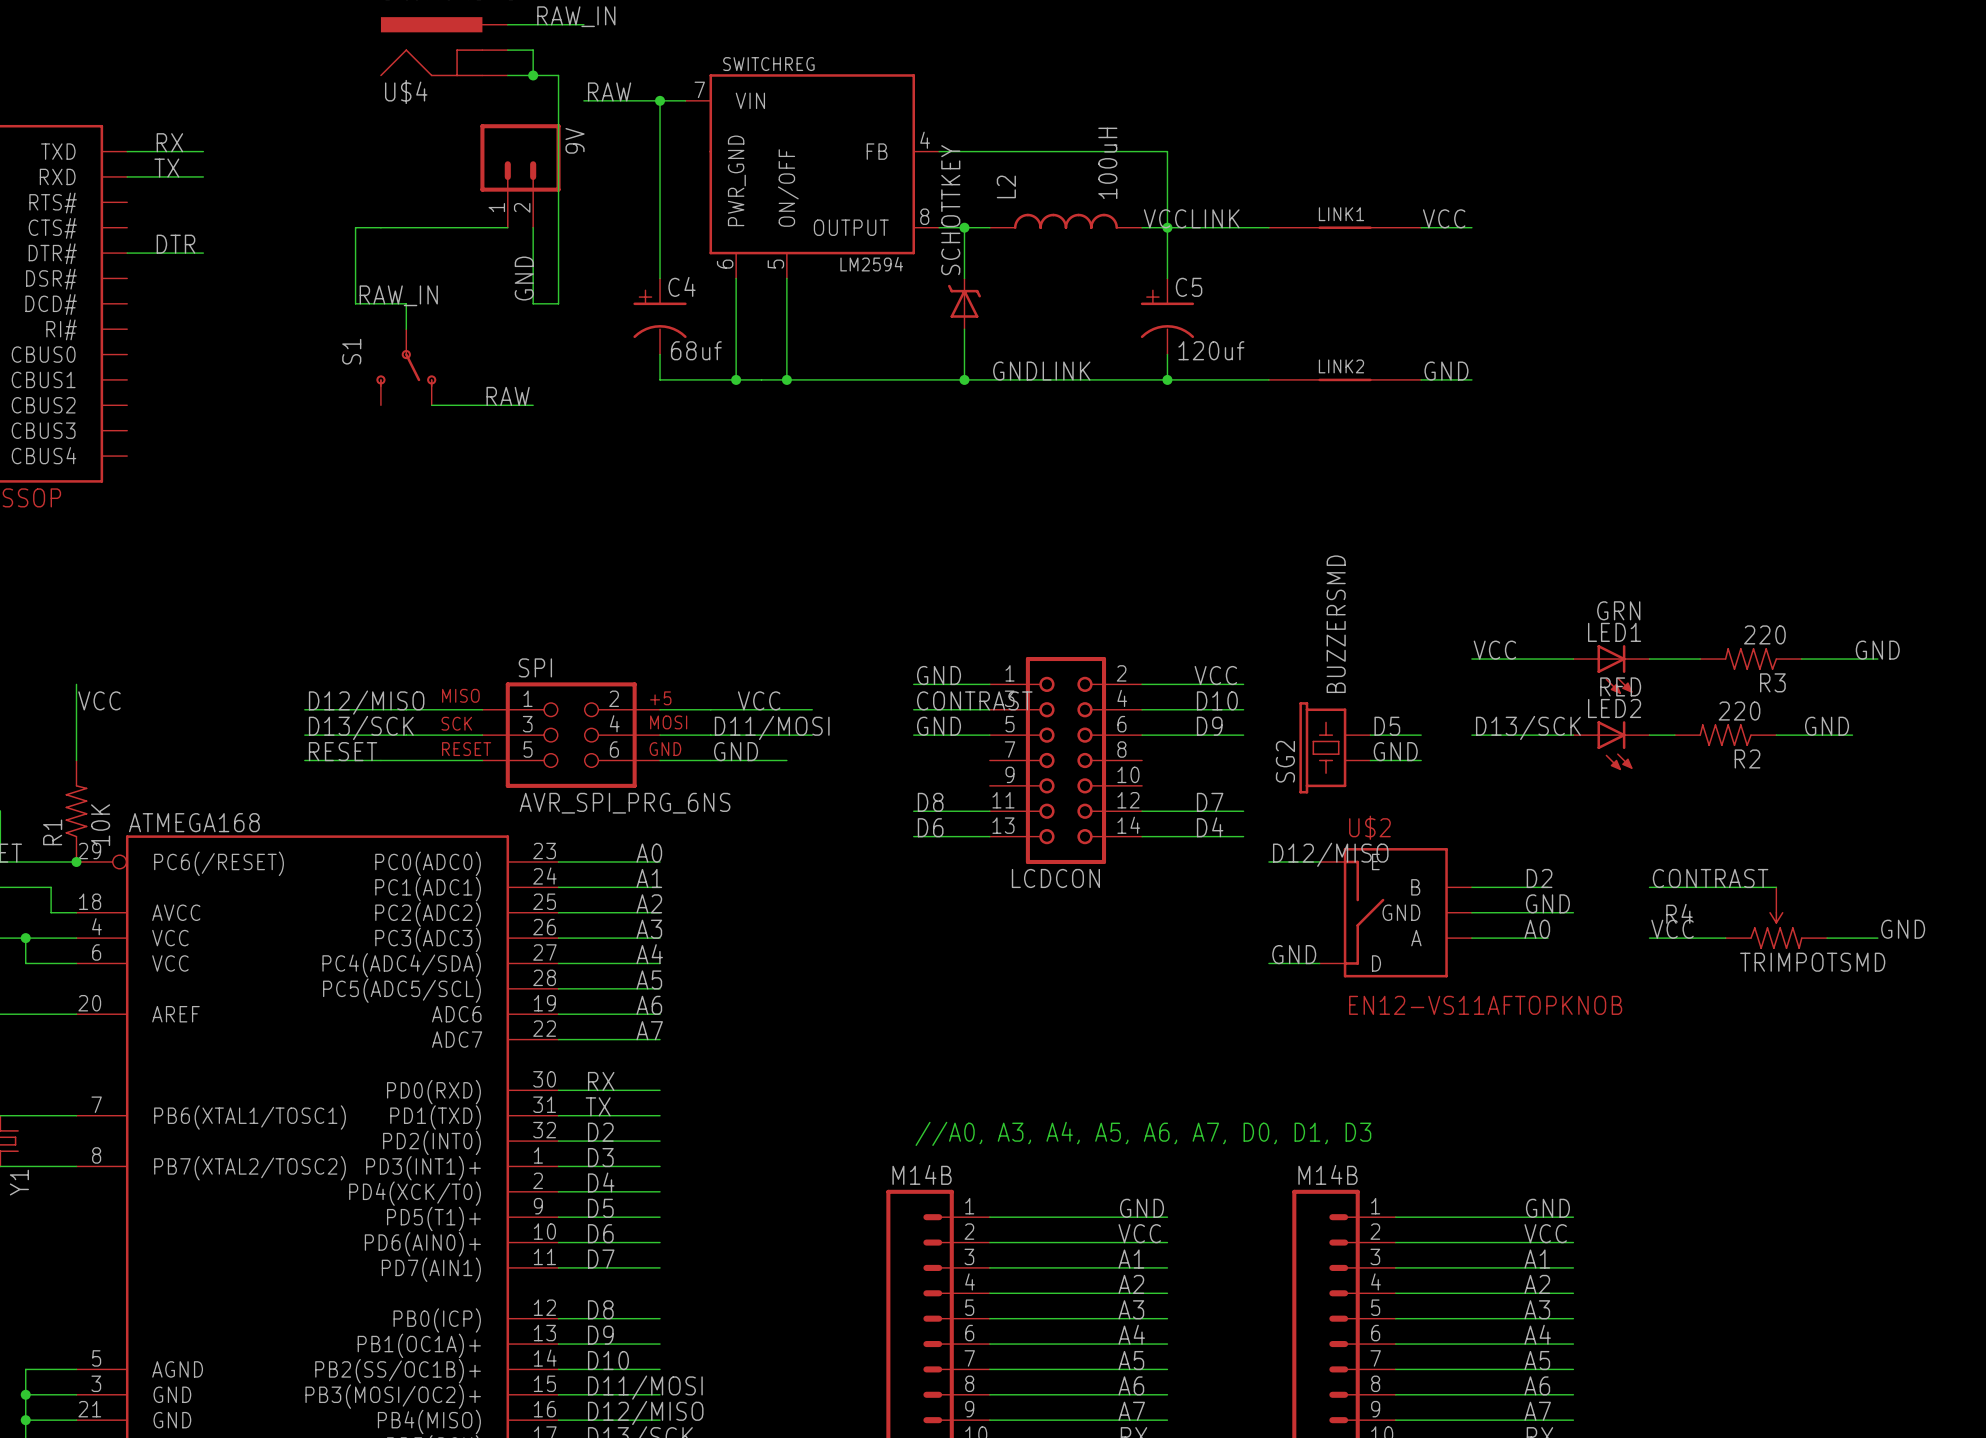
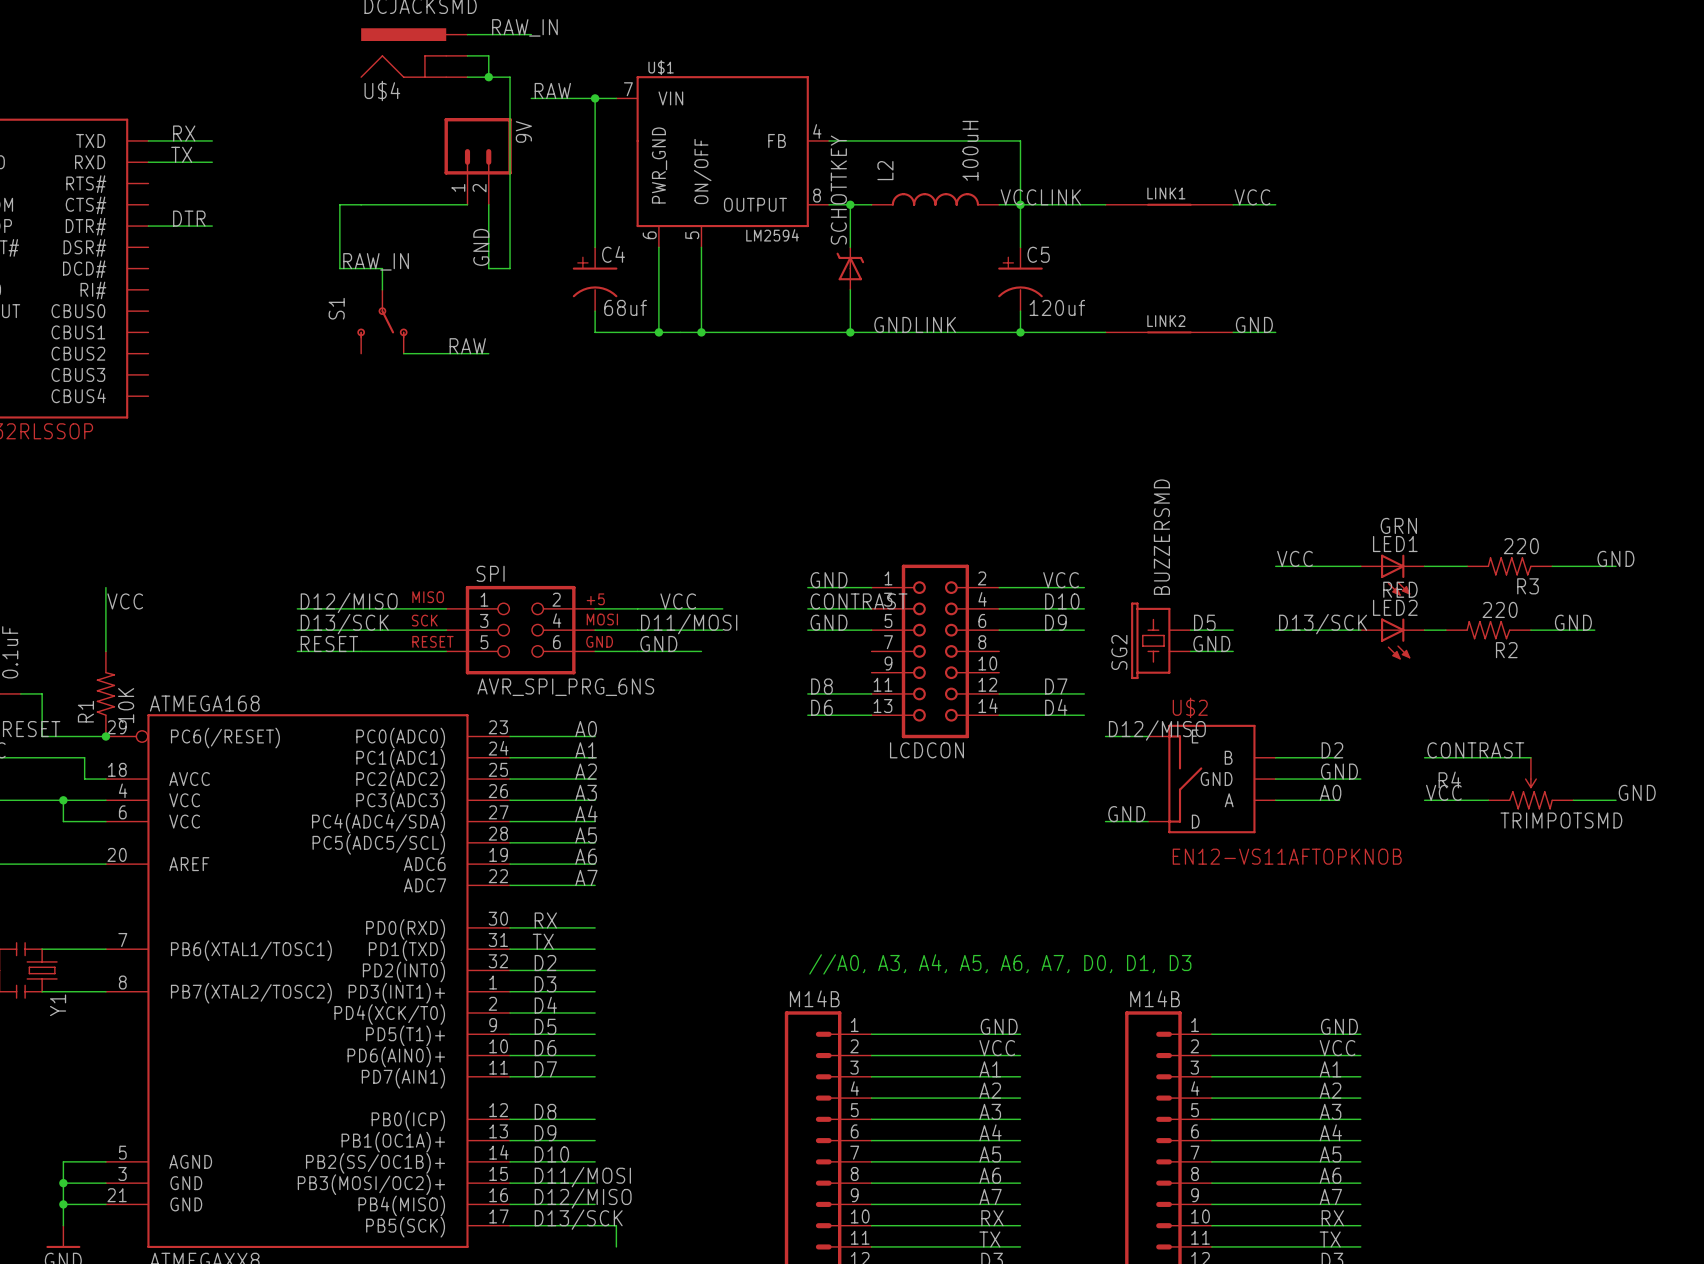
SWITCHREG name: SWITCHREG (768, 64) -> U$1 (661, 67)

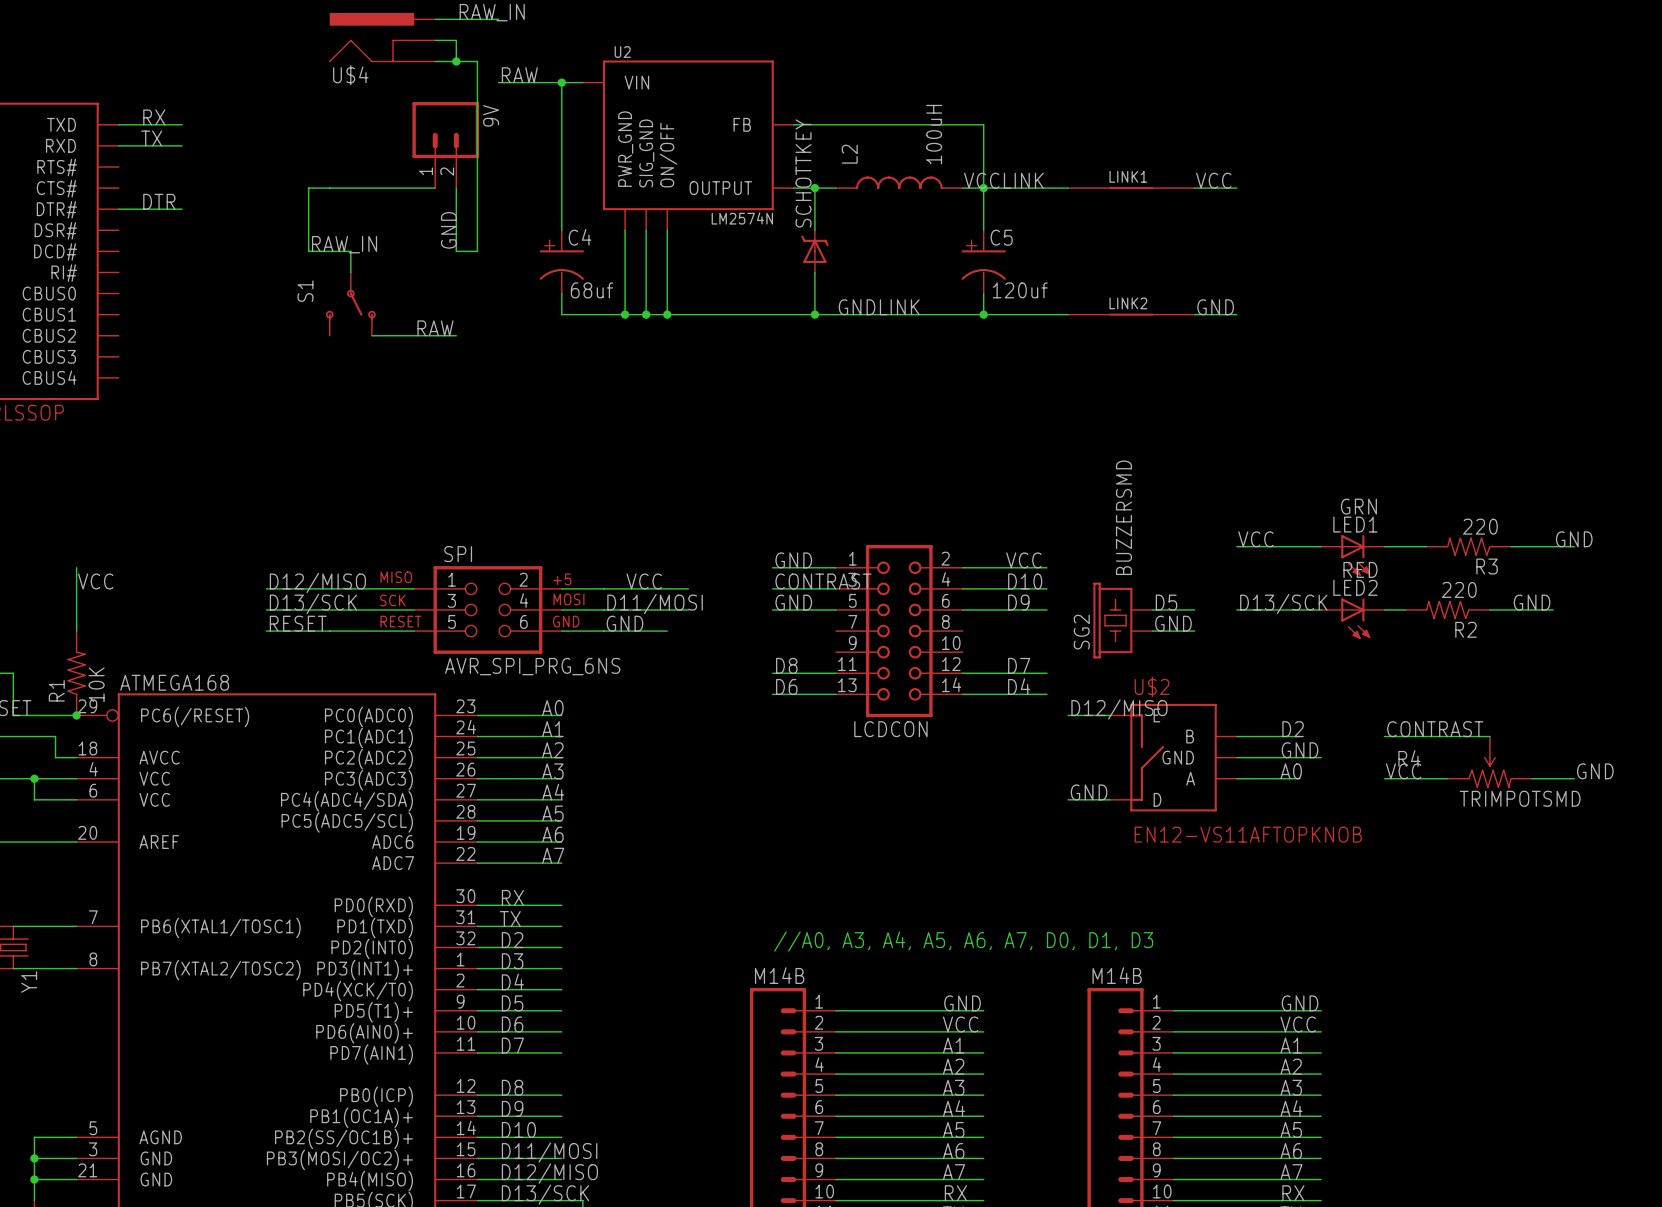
U$1: LM2594 (722, 161) -> none
U2: none -> LM2574N (688, 145)
wire: none -> (646, 230) (646, 314)
junction: none -> (646, 314)

